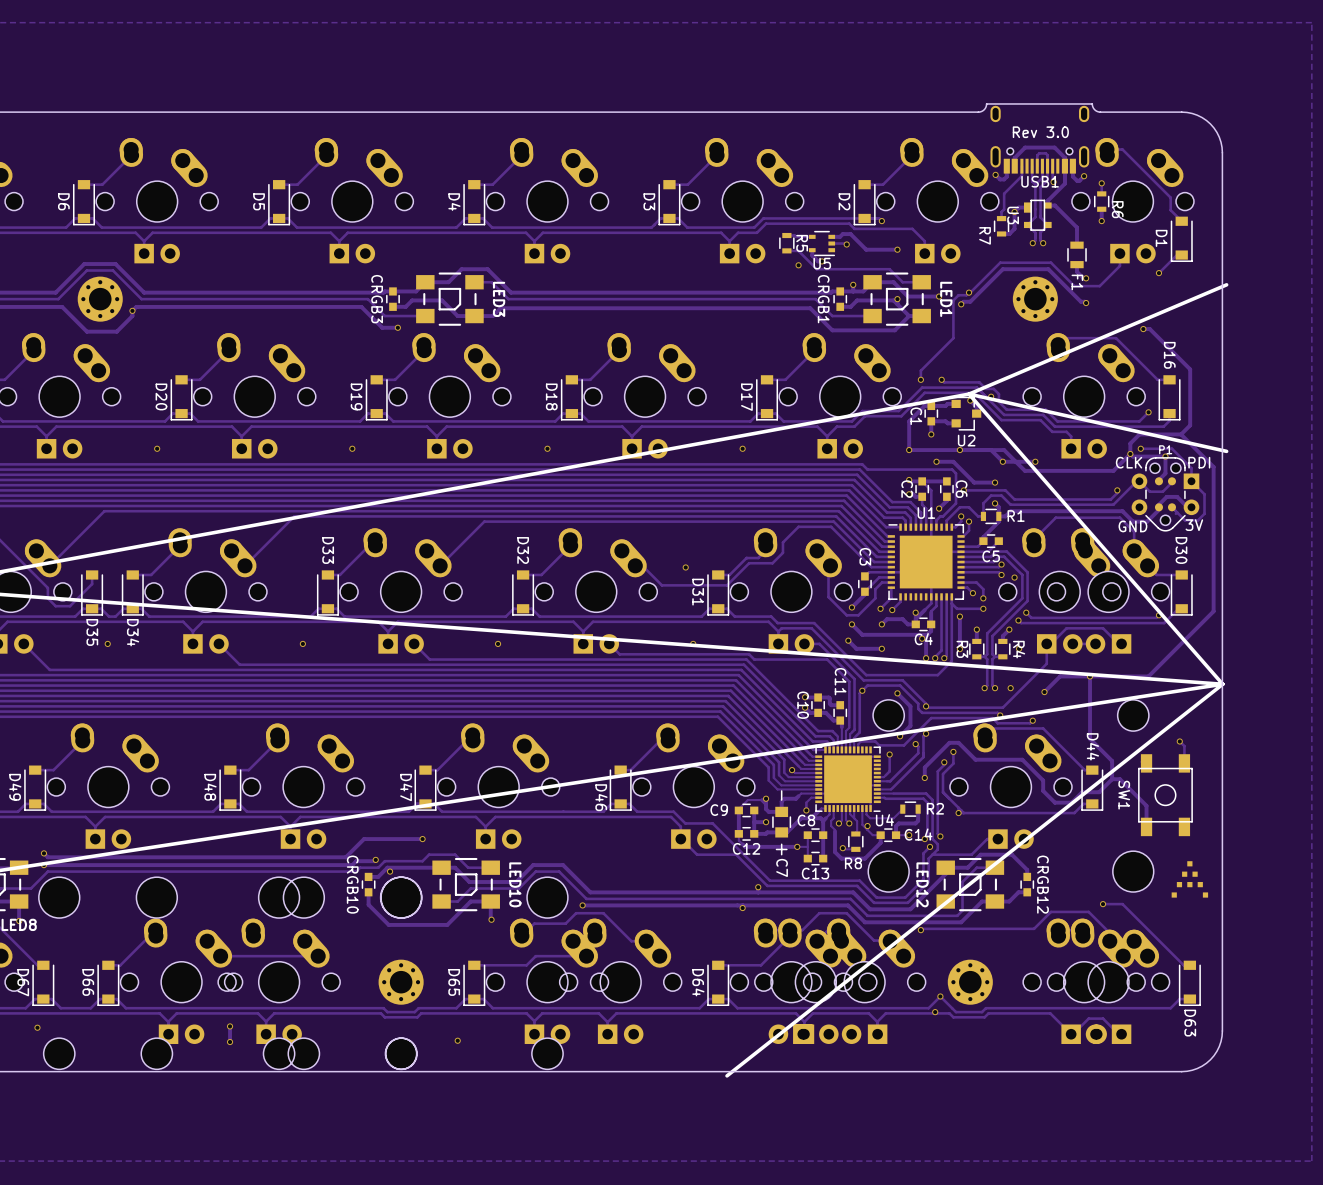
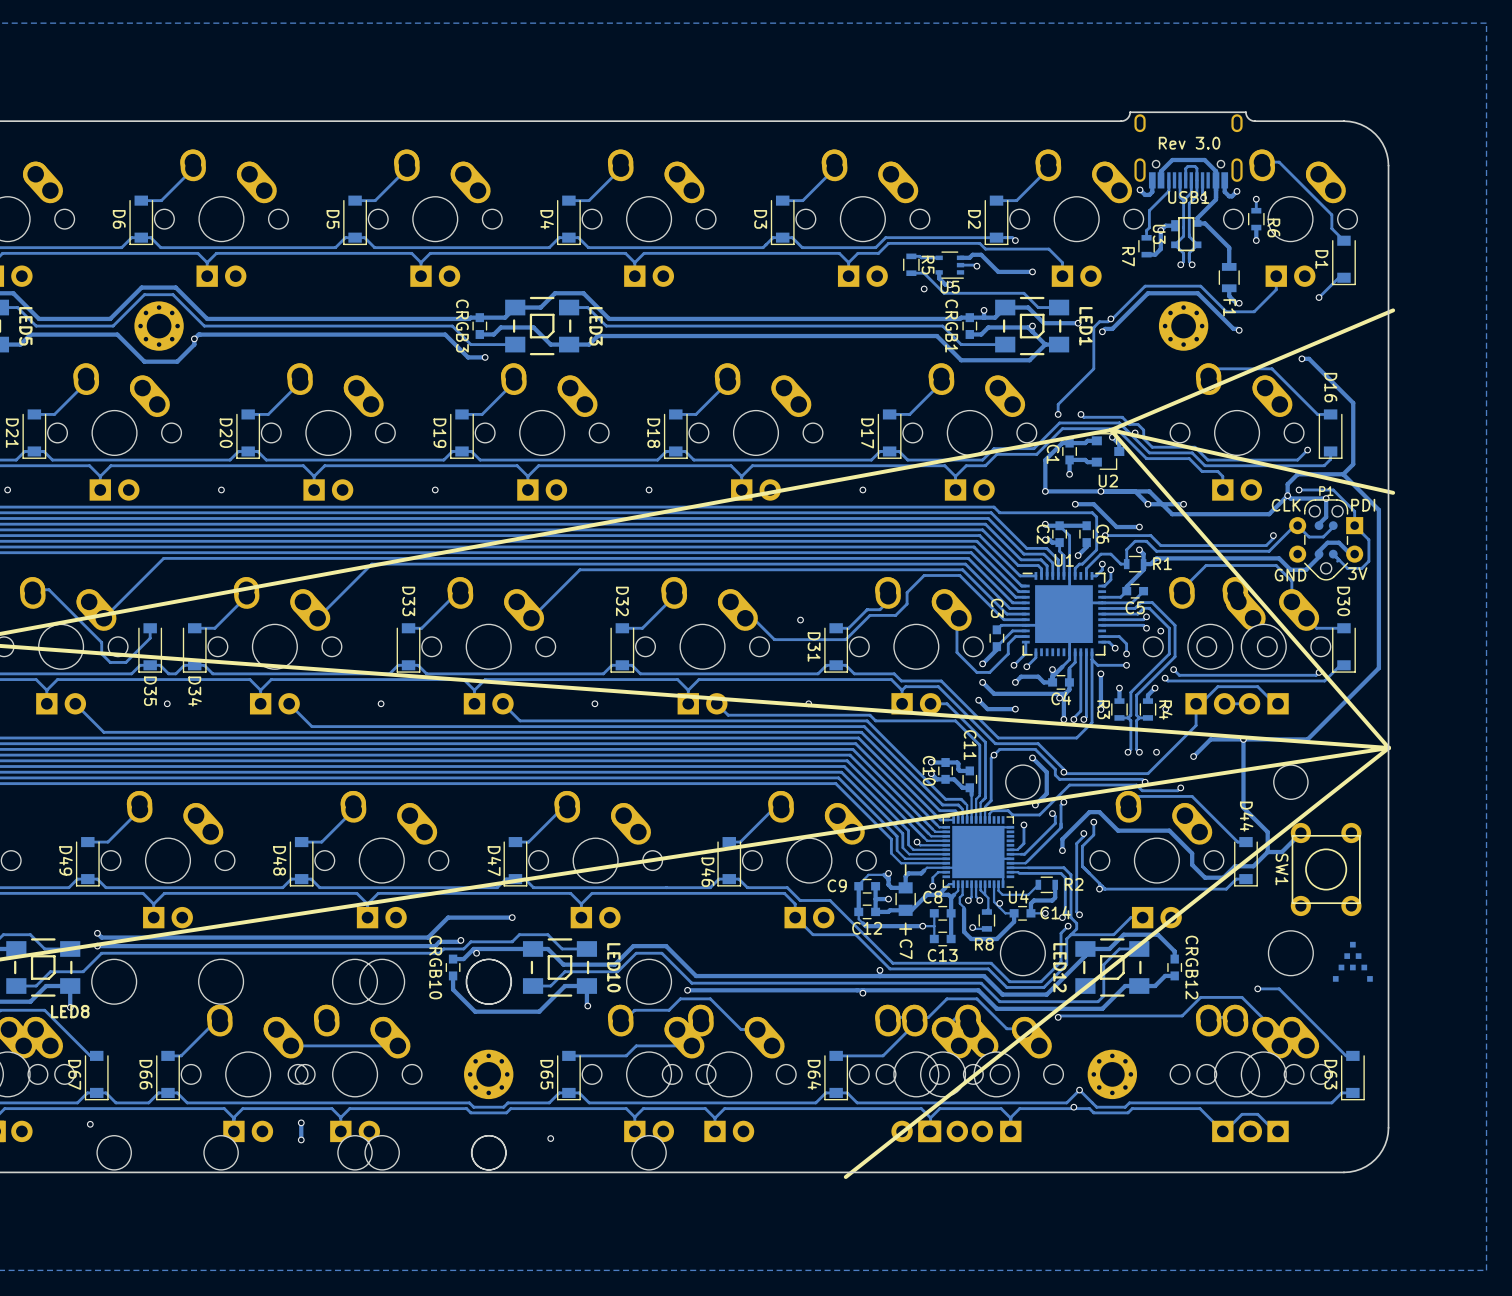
track: (1179, 741) (1184, 746) (1184, 763) -> none
via: (1179, 741) -> none
SW1 footprint: [1138, 754, 1193, 837] -> [1290, 822, 1362, 917]
track: (1119, 779) (1146, 805) (1146, 826) -> (1276, 852) (1281, 852) (1300, 833)
D63 name position: D63 (1190, 1023) -> D63 (1330, 1074)

